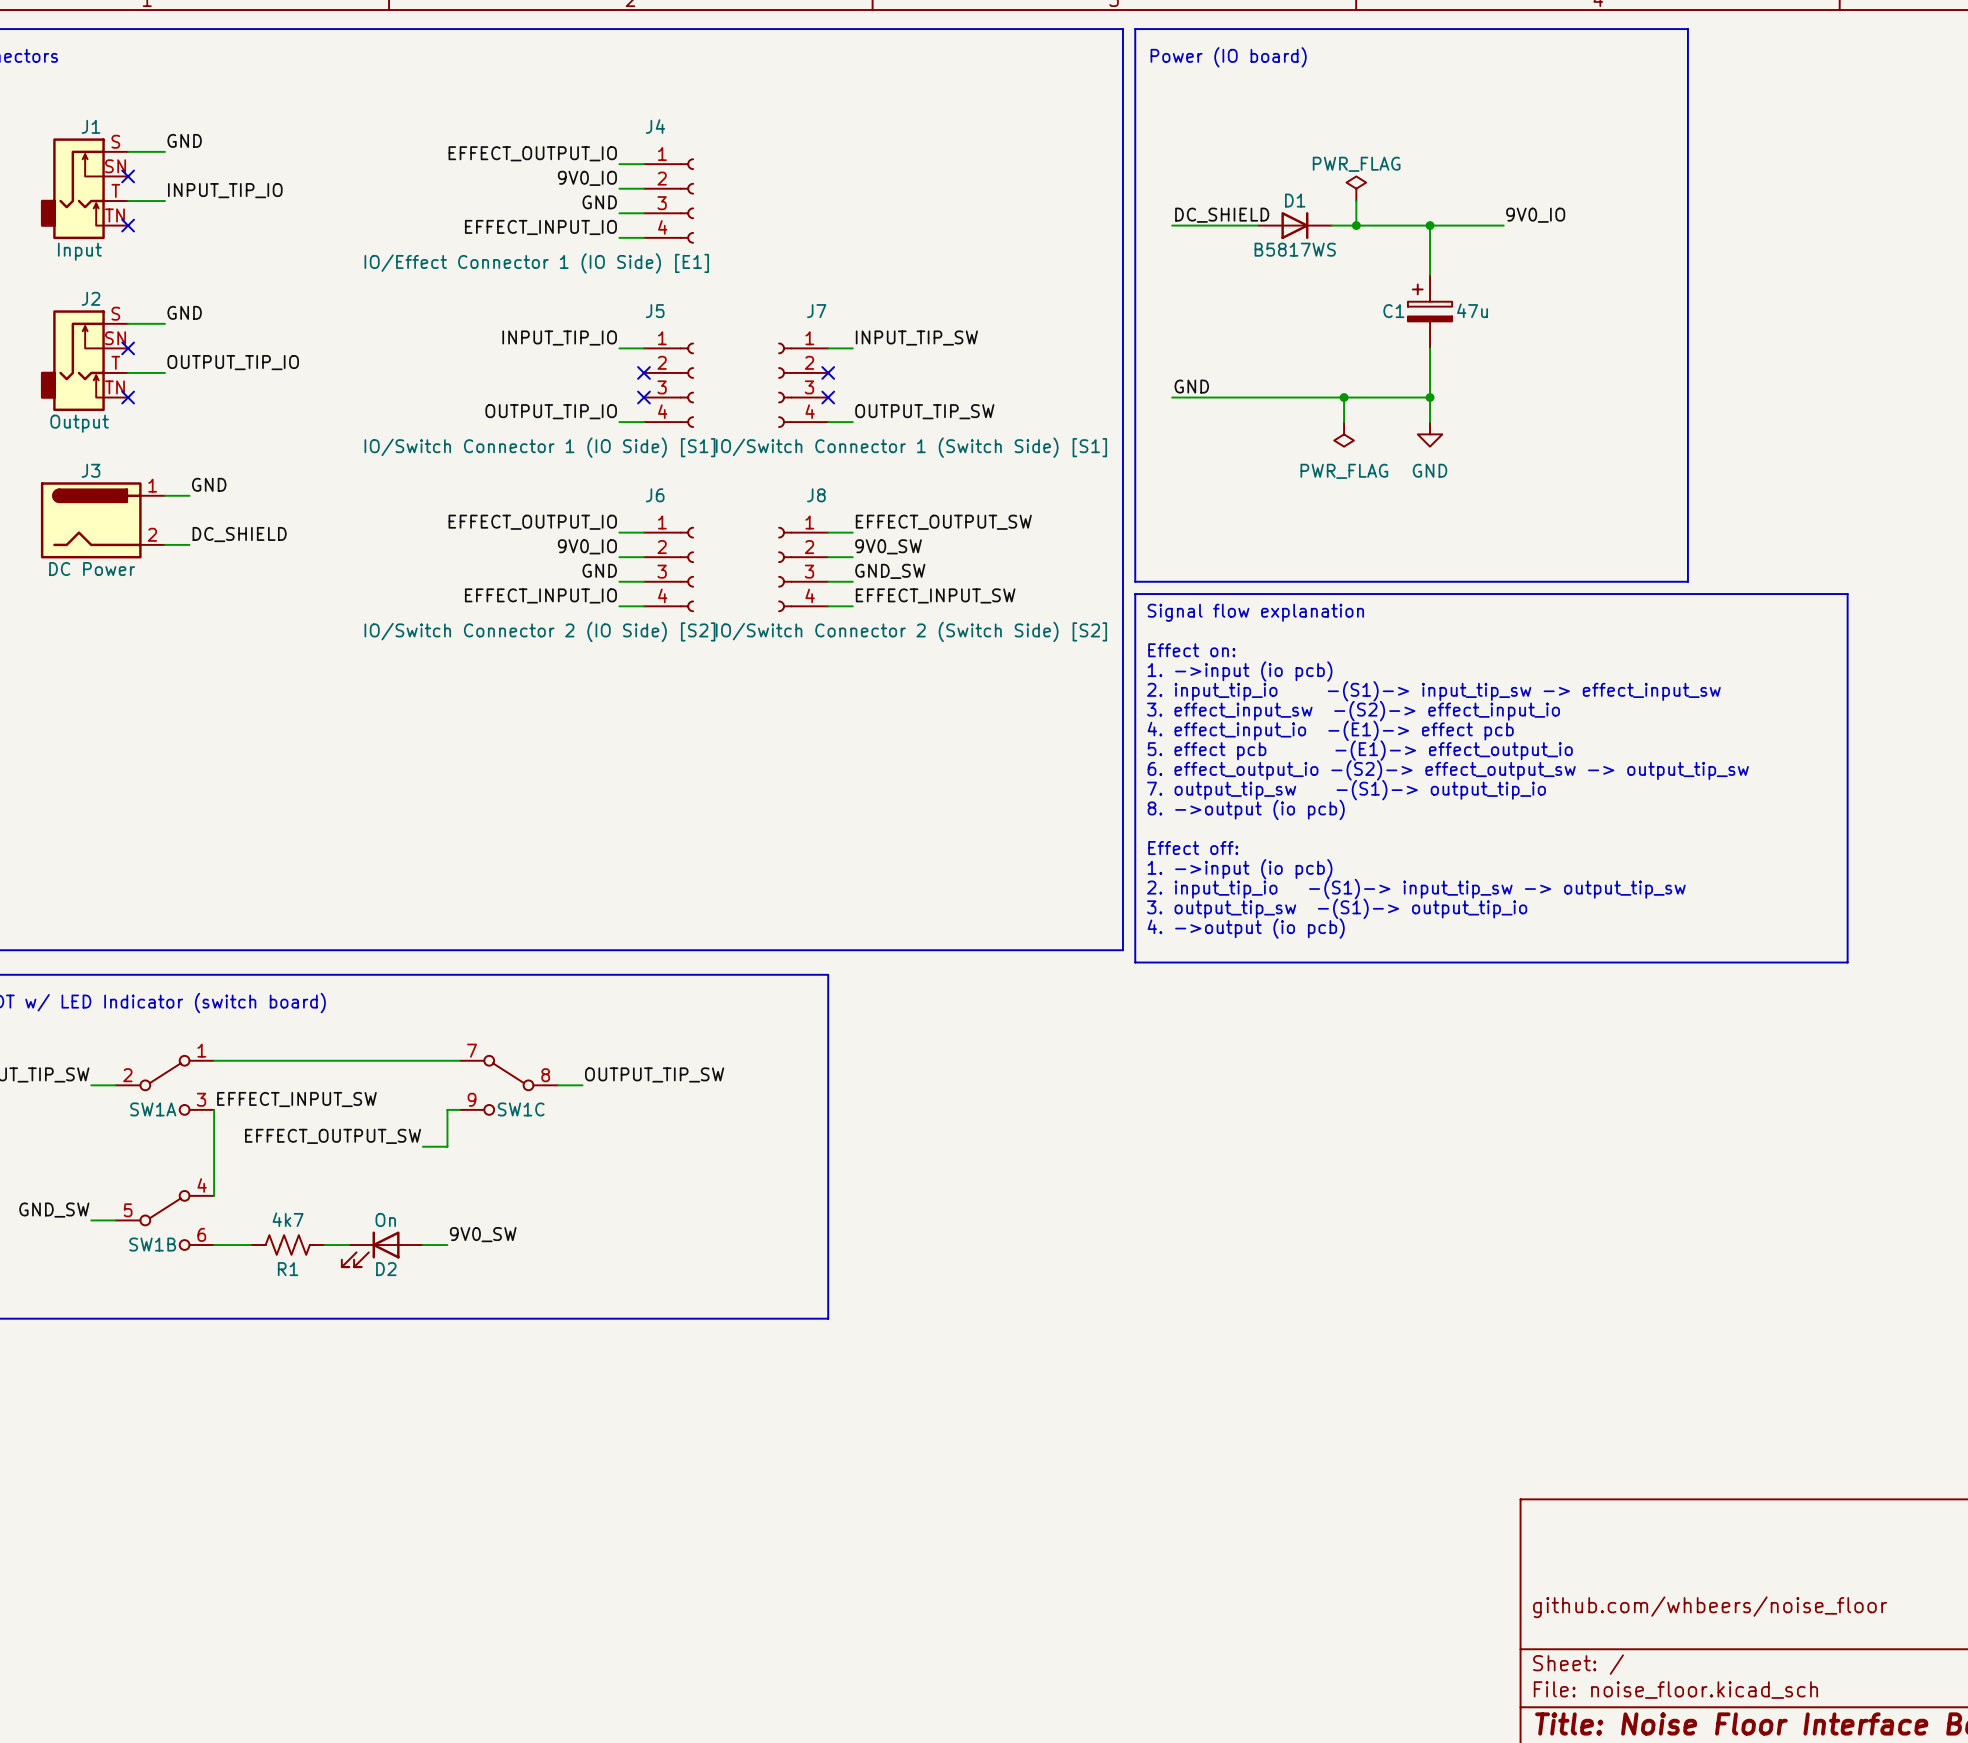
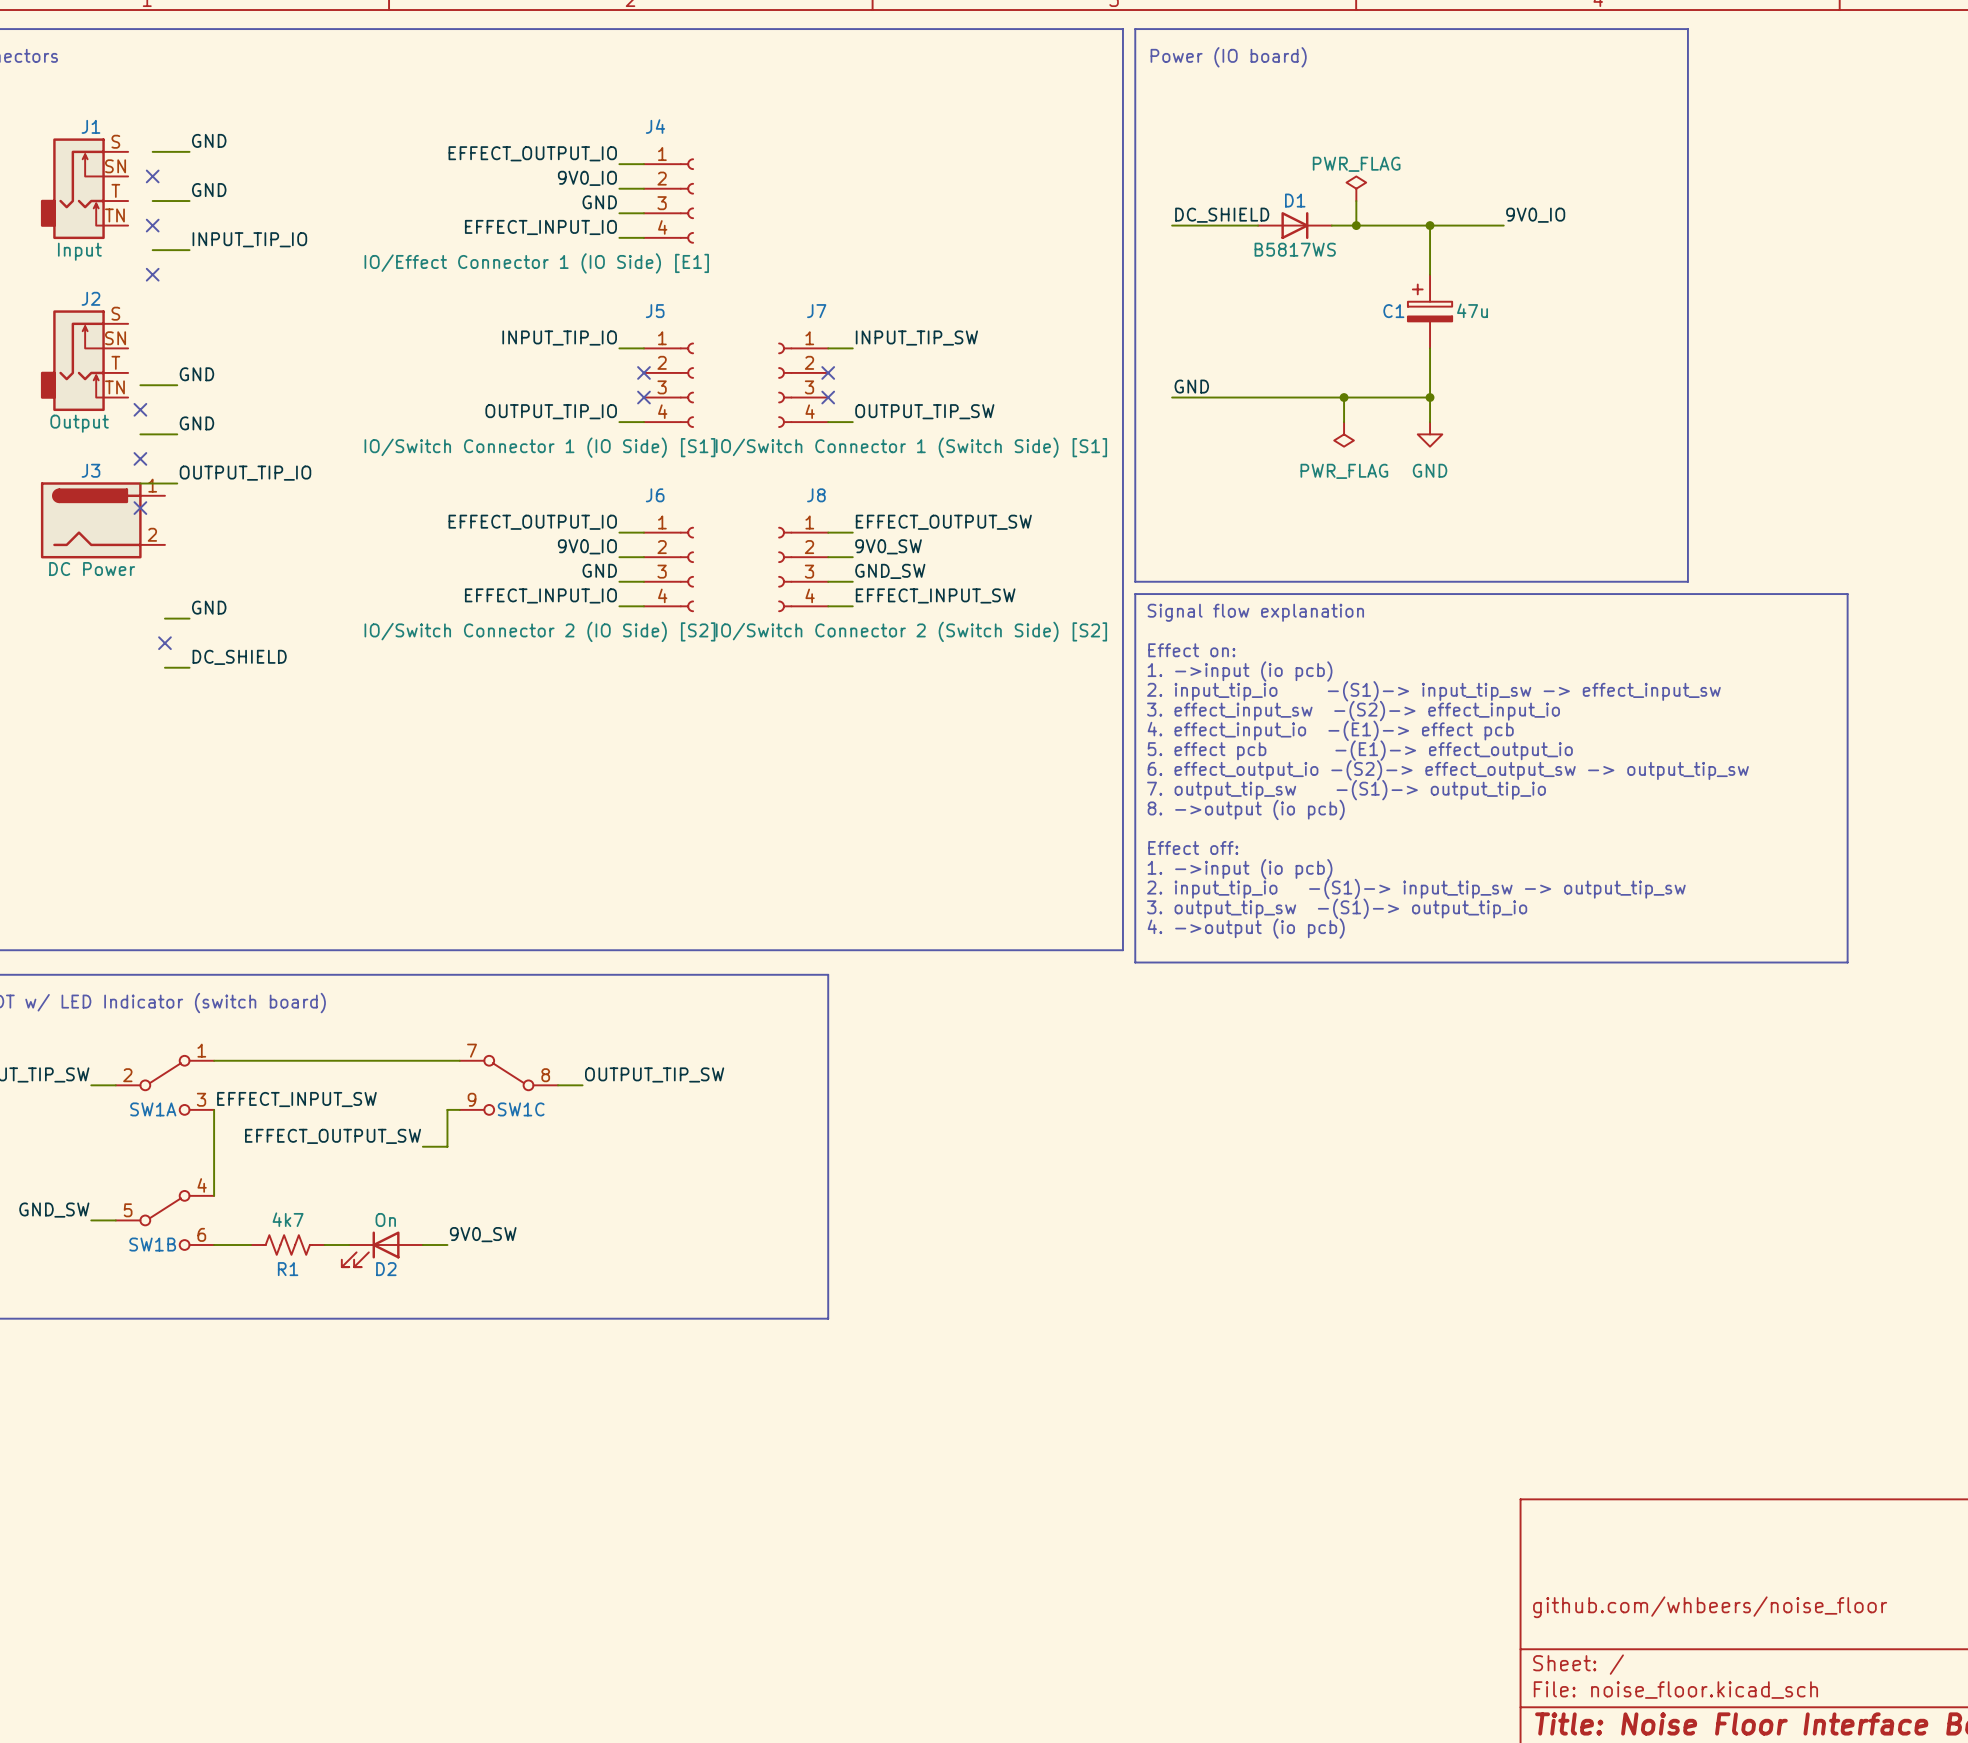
label position: GND (184, 140) -> GND (209, 140)
wire: (128, 151) (152, 151) -> (164, 151) (189, 151)
no-connect mark position: (128, 176) -> (152, 176)
label: none -> GND (209, 190)
label position: INPUT_TIP_IO (225, 190) -> INPUT_TIP_IO (249, 239)
wire: (128, 201) (152, 201) -> (164, 201) (189, 201)
no-connect mark position: (128, 225) -> (152, 225)
wire: none -> (152, 250) (189, 250)
no-connect mark: none -> (152, 274)
label: GND (184, 312) -> none
wire: (128, 323) (164, 323) -> (140, 385) (177, 385)
no-connect mark: (128, 348) -> none
label position: OUTPUT_TIP_IO (233, 362) -> OUTPUT_TIP_IO (245, 473)
wire: (128, 372) (164, 372) -> (140, 434) (177, 434)
label: none -> GND (196, 374)
no-connect mark position: (128, 397) -> (140, 409)
label: none -> GND (196, 423)
no-connect mark: none -> (140, 458)
wire: none -> (140, 483) (177, 483)
label: GND (209, 484) -> none
wire: (164, 495) (189, 495) -> (164, 618) (189, 618)
no-connect mark: none -> (140, 508)
label position: DC_SHIELD (239, 534) -> DC_SHIELD (239, 657)
wire: (164, 544) (189, 544) -> (164, 667) (189, 667)
label: none -> GND (209, 607)
no-connect mark: none -> (164, 643)

